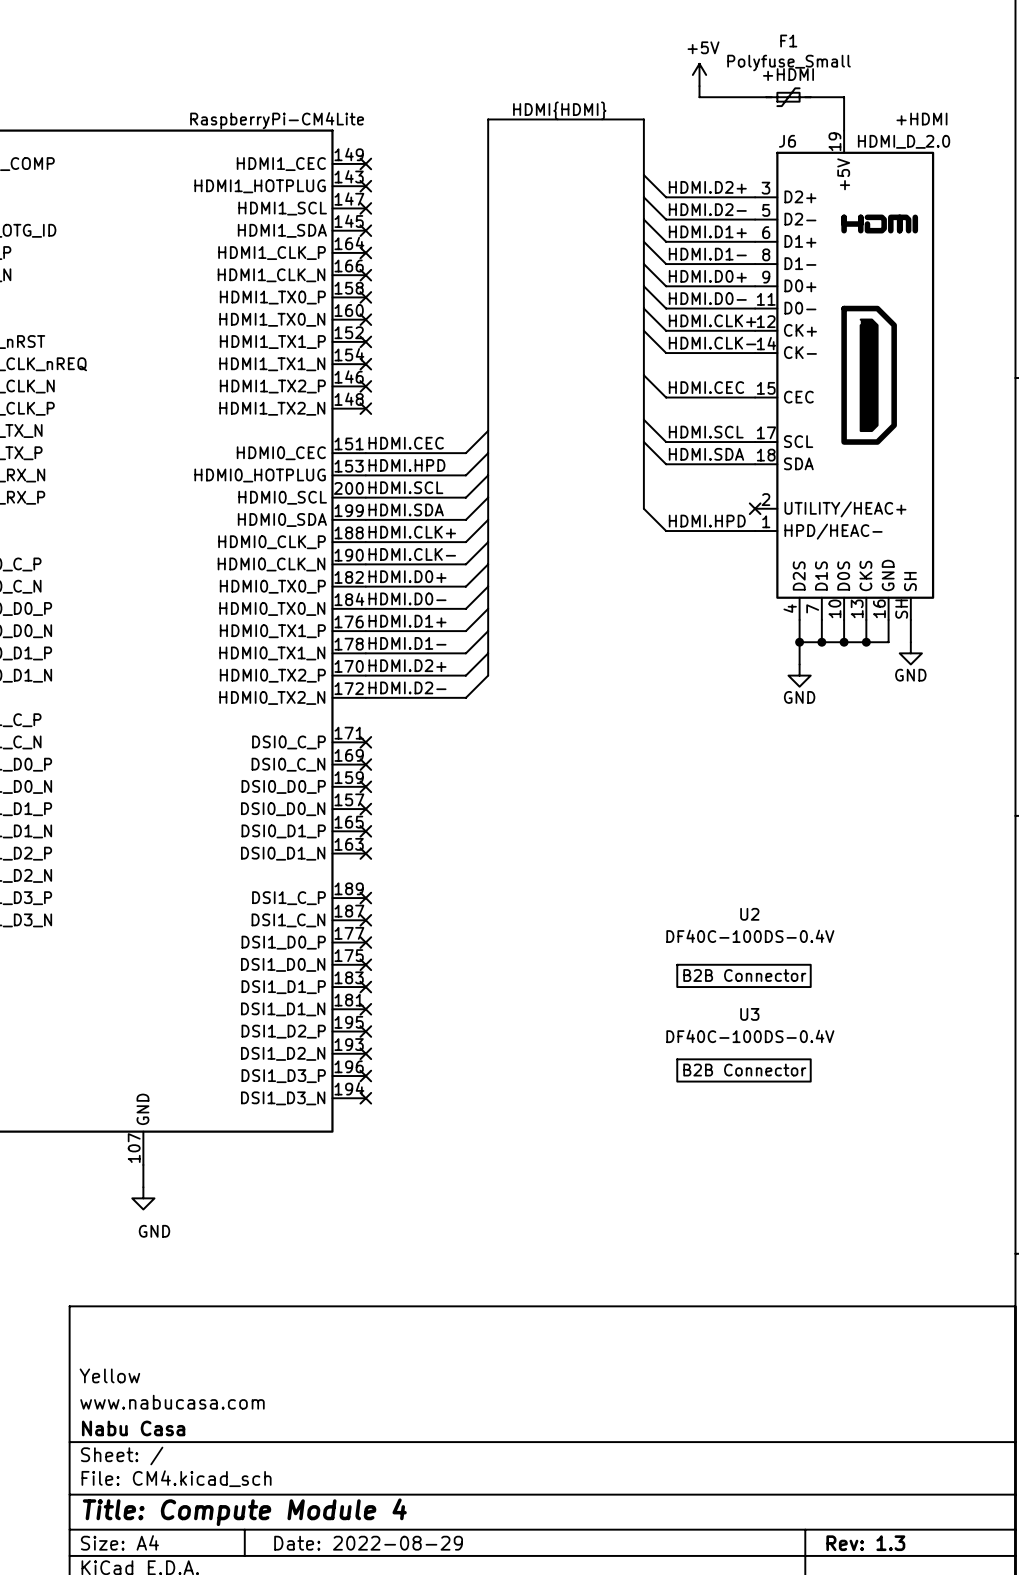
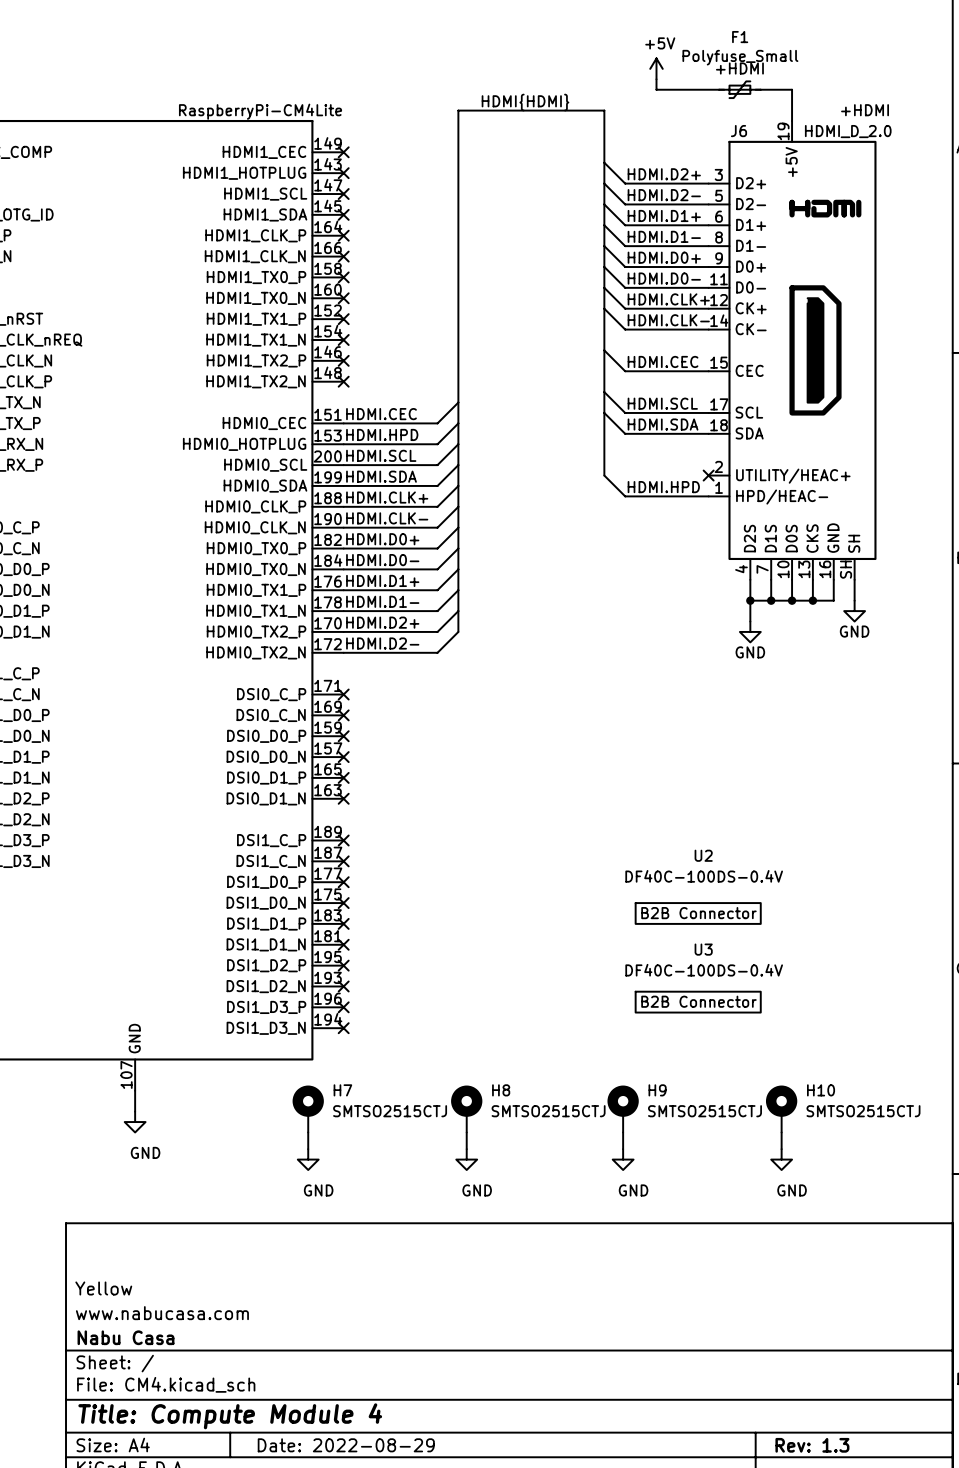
H7: none -> SMTSO2515CTJ (308, 1109)
H8: none -> SMTSO2515CTJ (466, 1109)
H9: none -> SMTSO2515CTJ (623, 1109)
H10: none -> SMTSO2515CTJ (781, 1109)
wire: none -> (308, 1132) (308, 1149)
wire: none -> (466, 1132) (466, 1149)
wire: none -> (623, 1132) (623, 1149)
wire: none -> (781, 1132) (781, 1149)
power symbol: none -> GND (308, 1159)
power symbol: none -> GND (466, 1159)
power symbol: none -> GND (623, 1159)
power symbol: none -> GND (781, 1159)

